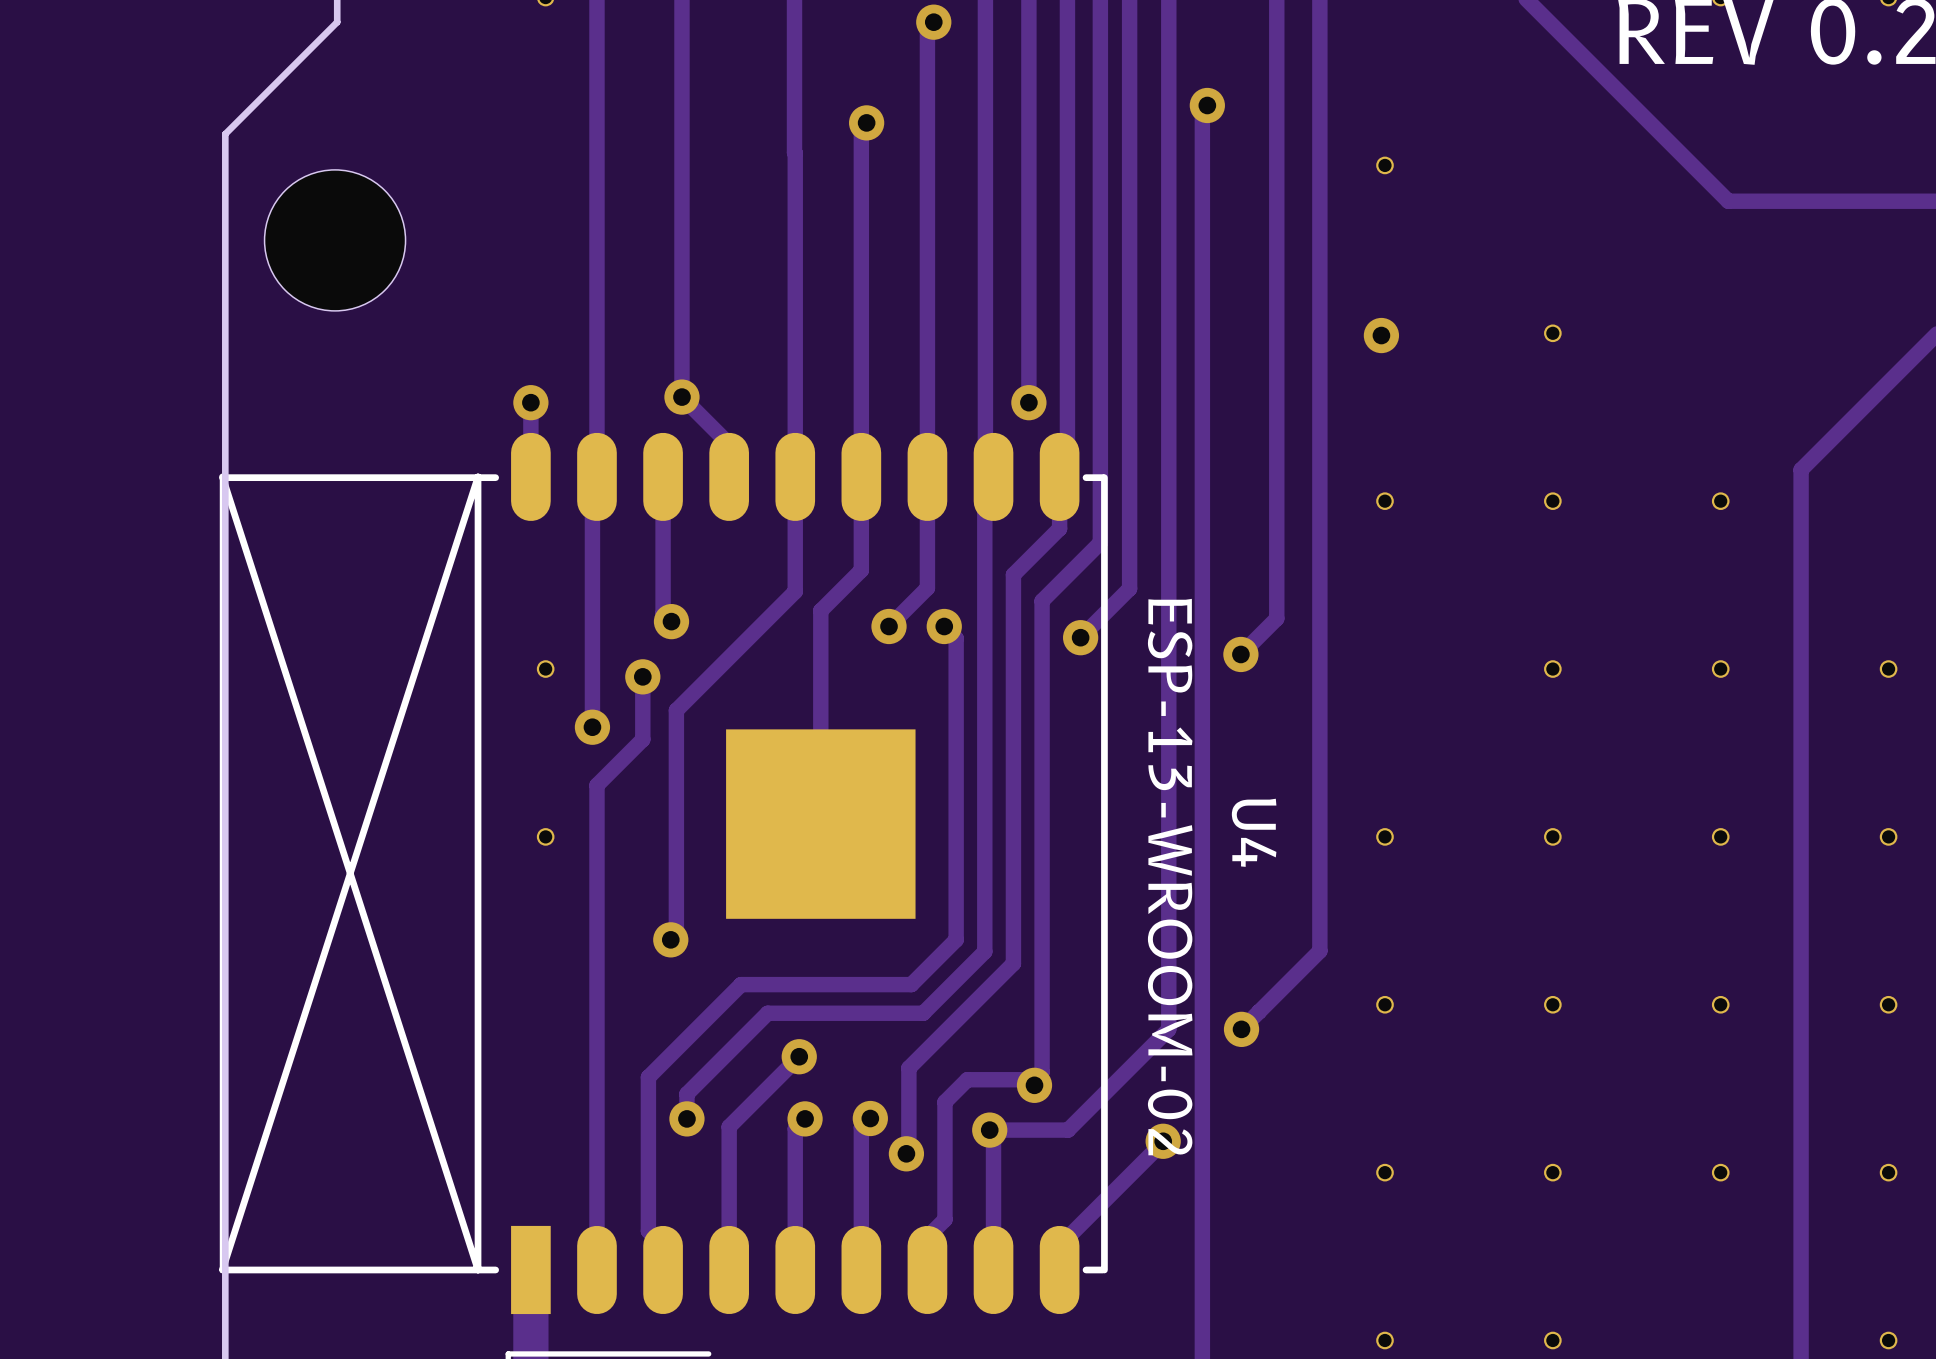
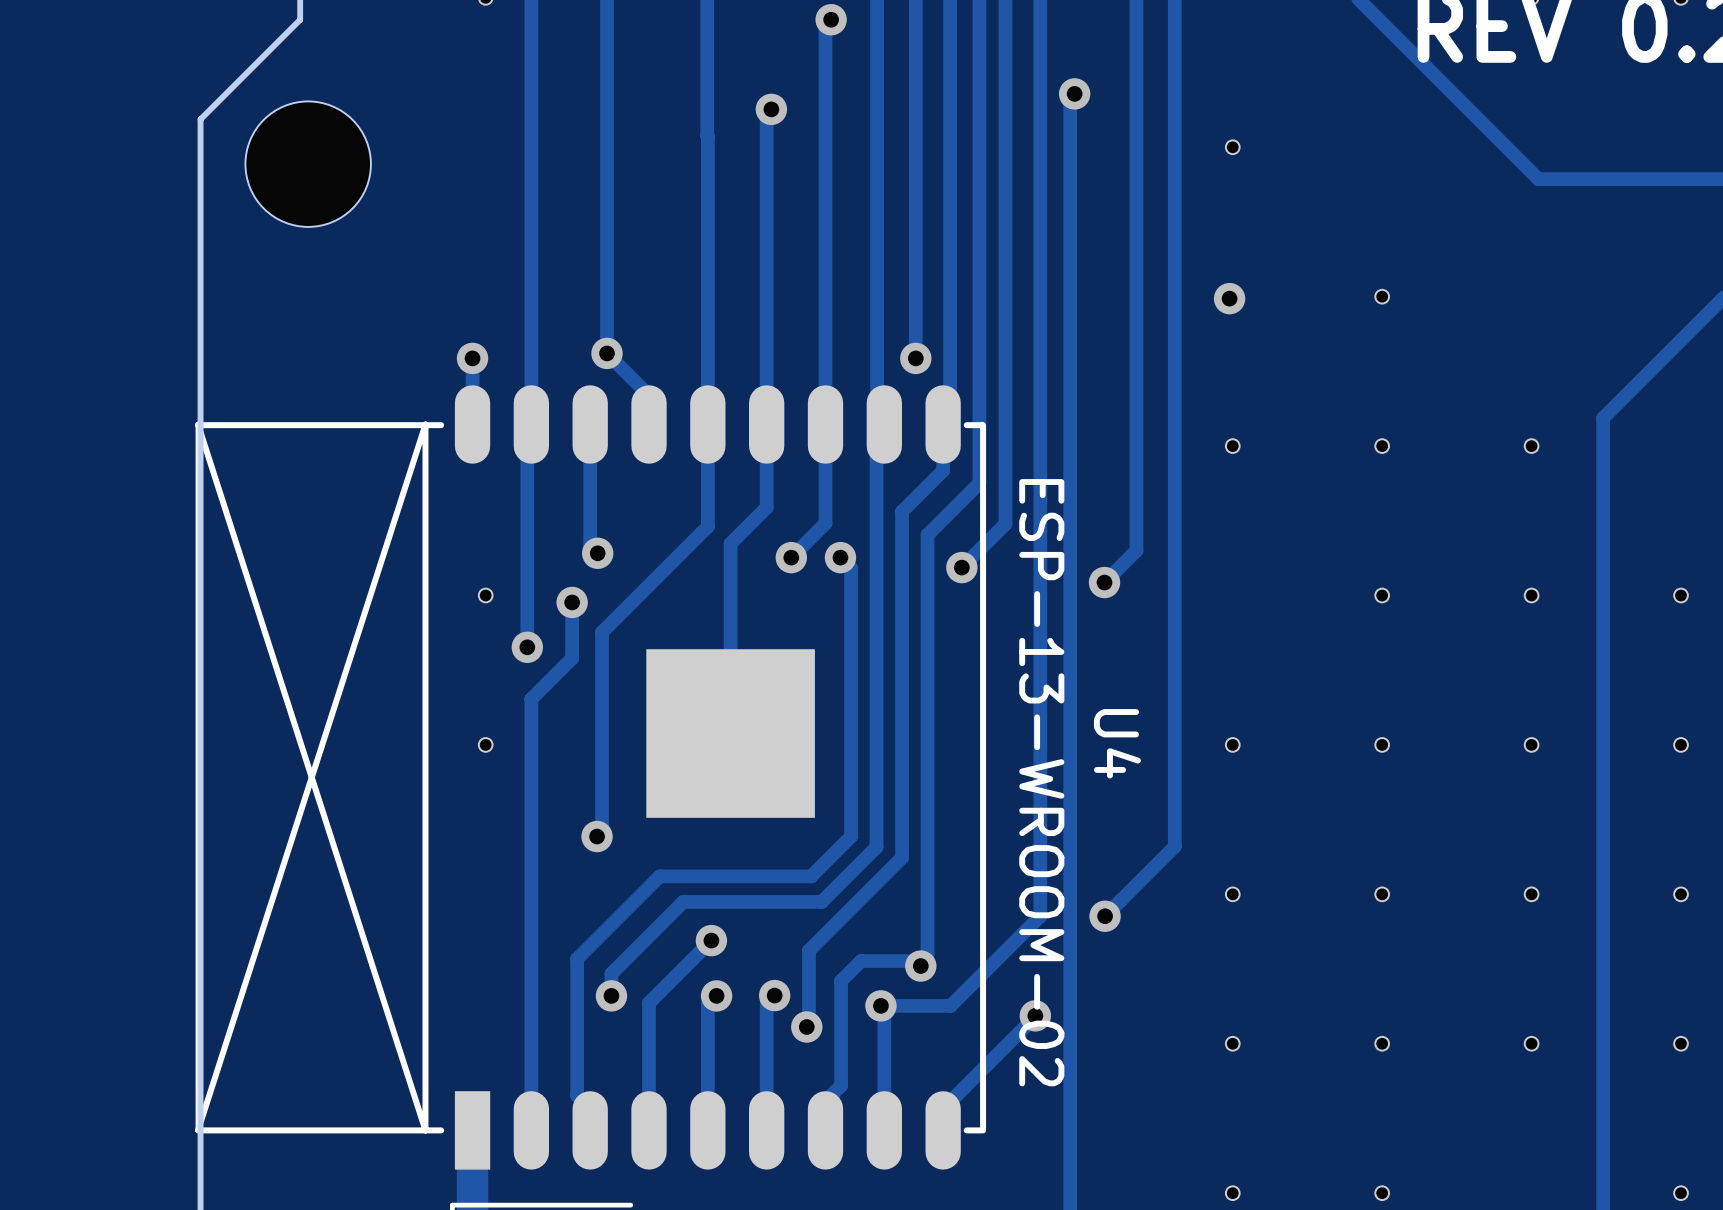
part position: (335, 240) -> (308, 164)

